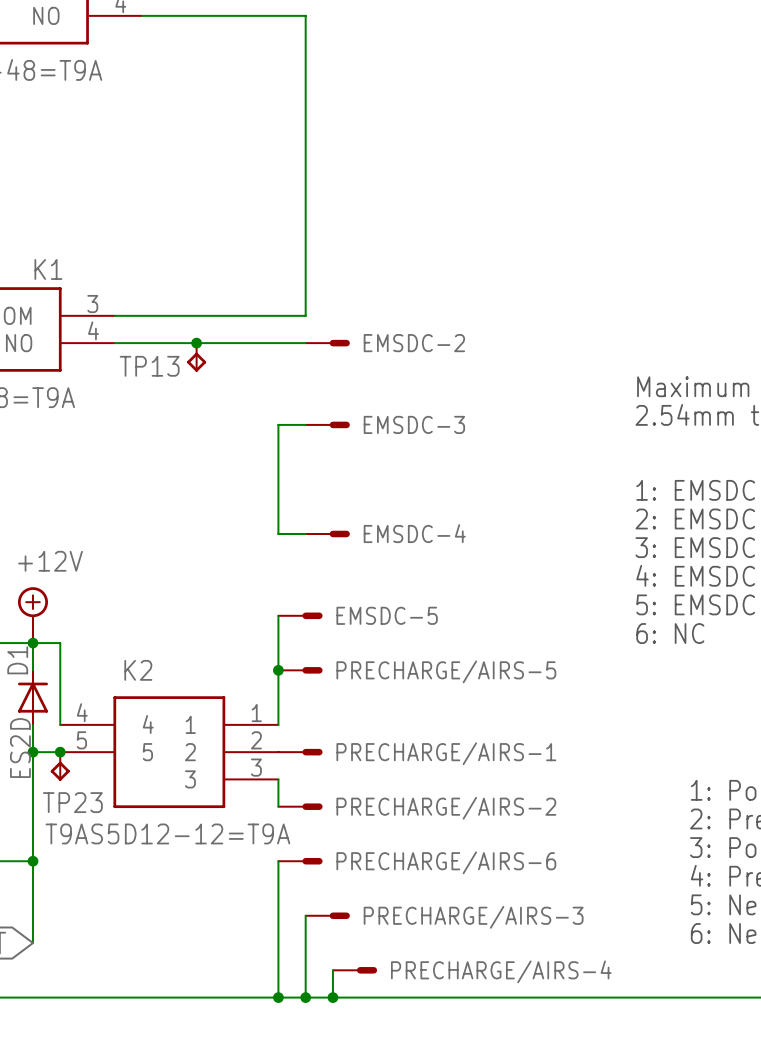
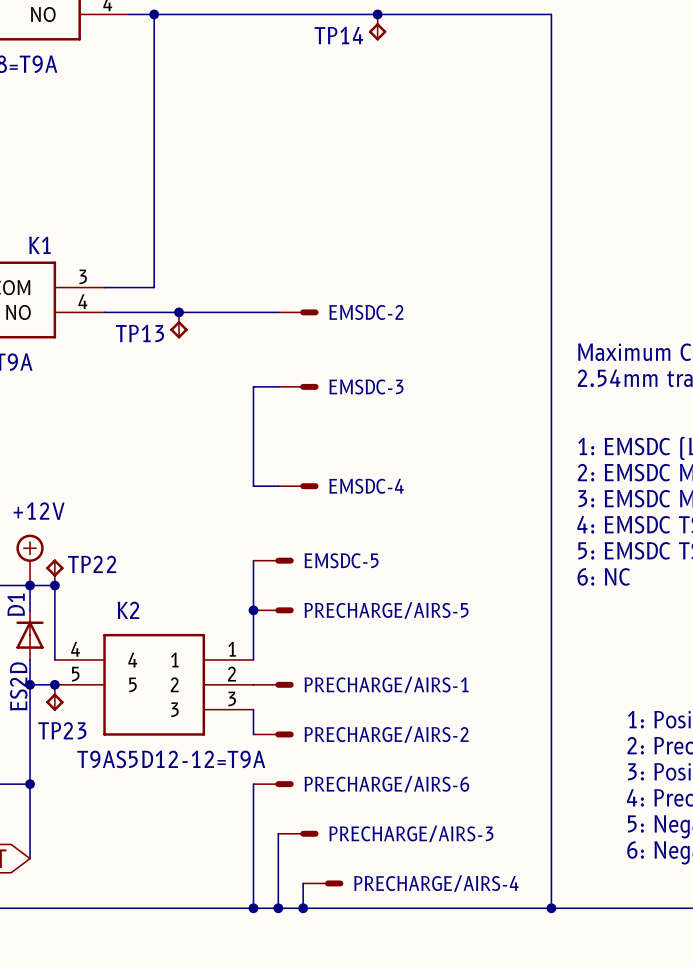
junction: none -> (154, 14)
wire: (305, 15) (305, 315) (169, 315) -> (154, 14) (154, 287)
wire: none -> (278, 14) (551, 14) (551, 908)
junction: none -> (377, 14)
TP14: none -> (377, 27)
TP22: none -> (54, 572)
junction: none -> (54, 585)
junction: none -> (551, 908)

